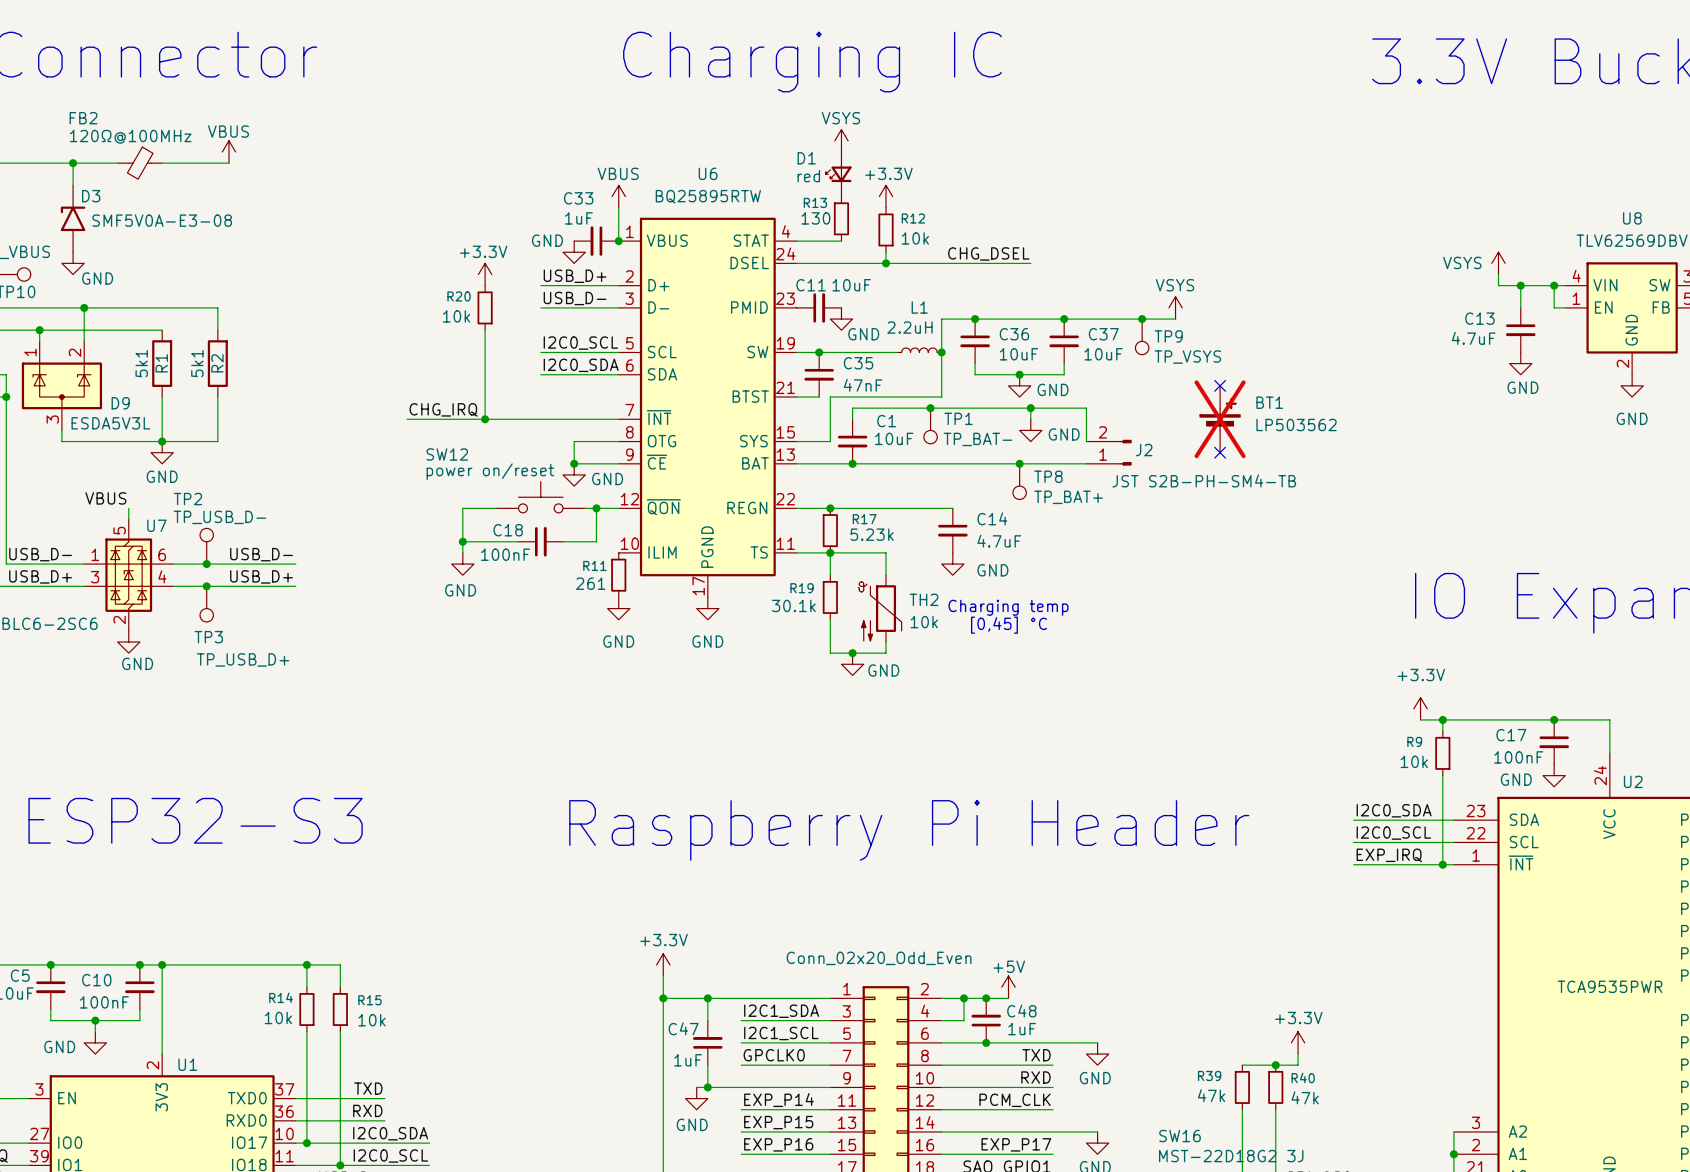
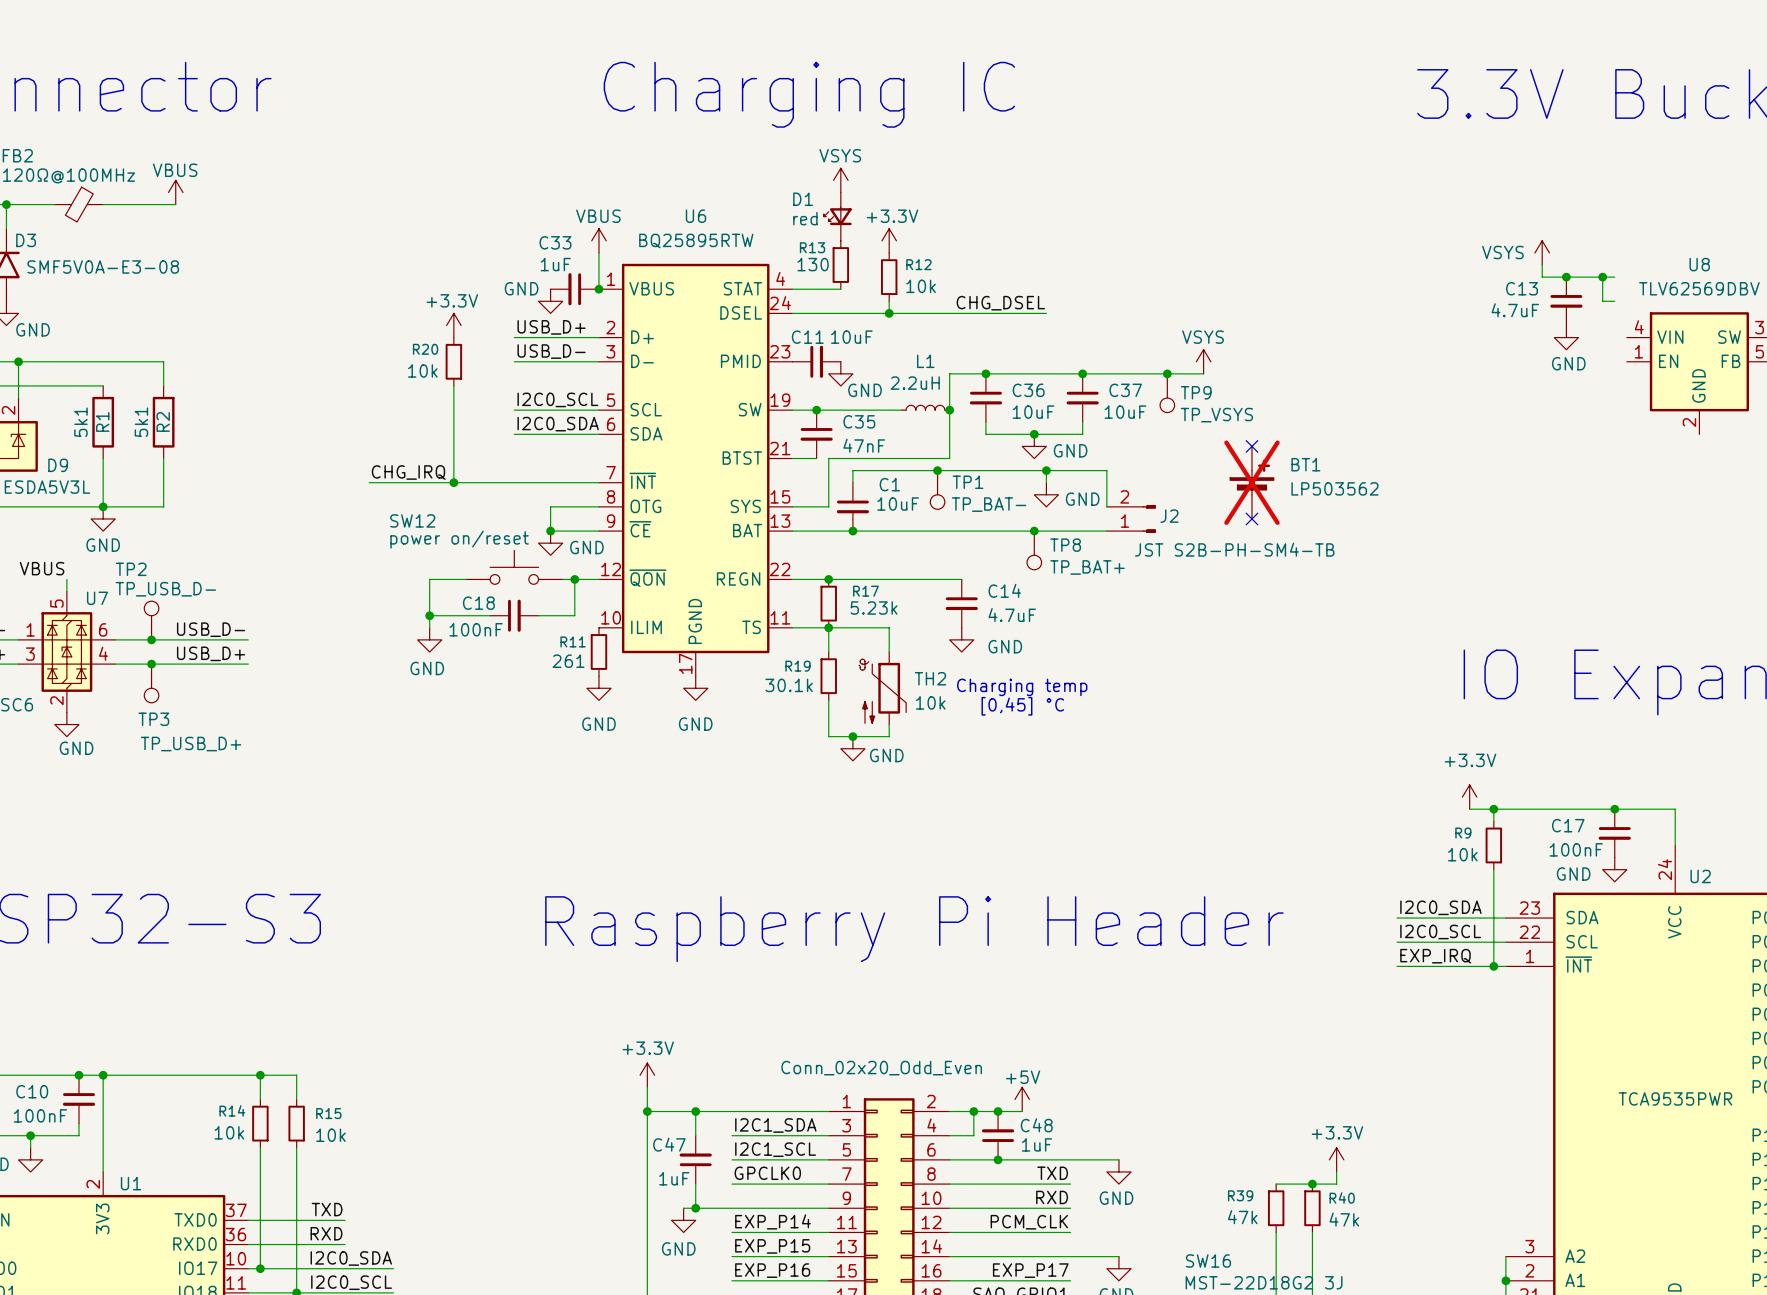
junction: none -> (1566, 277)
junction: none -> (1602, 277)
power symbol position: VSYS (1498, 263) -> VSYS (1542, 252)
wire: (1498, 274) (1498, 285) (1565, 285) -> (1542, 265) (1542, 277) (1614, 277)
wire: (1520, 285) (1520, 307) -> none
junction: (1520, 285) -> none
wire: (1554, 285) (1554, 307) (1565, 307) -> (1602, 277) (1602, 301) (1614, 301)
junction: (1554, 285) -> none
C13 position: (1520, 330) -> (1566, 301)
power symbol position: GND (1520, 363) -> GND (1566, 337)
power symbol: GND (1632, 385) -> none

